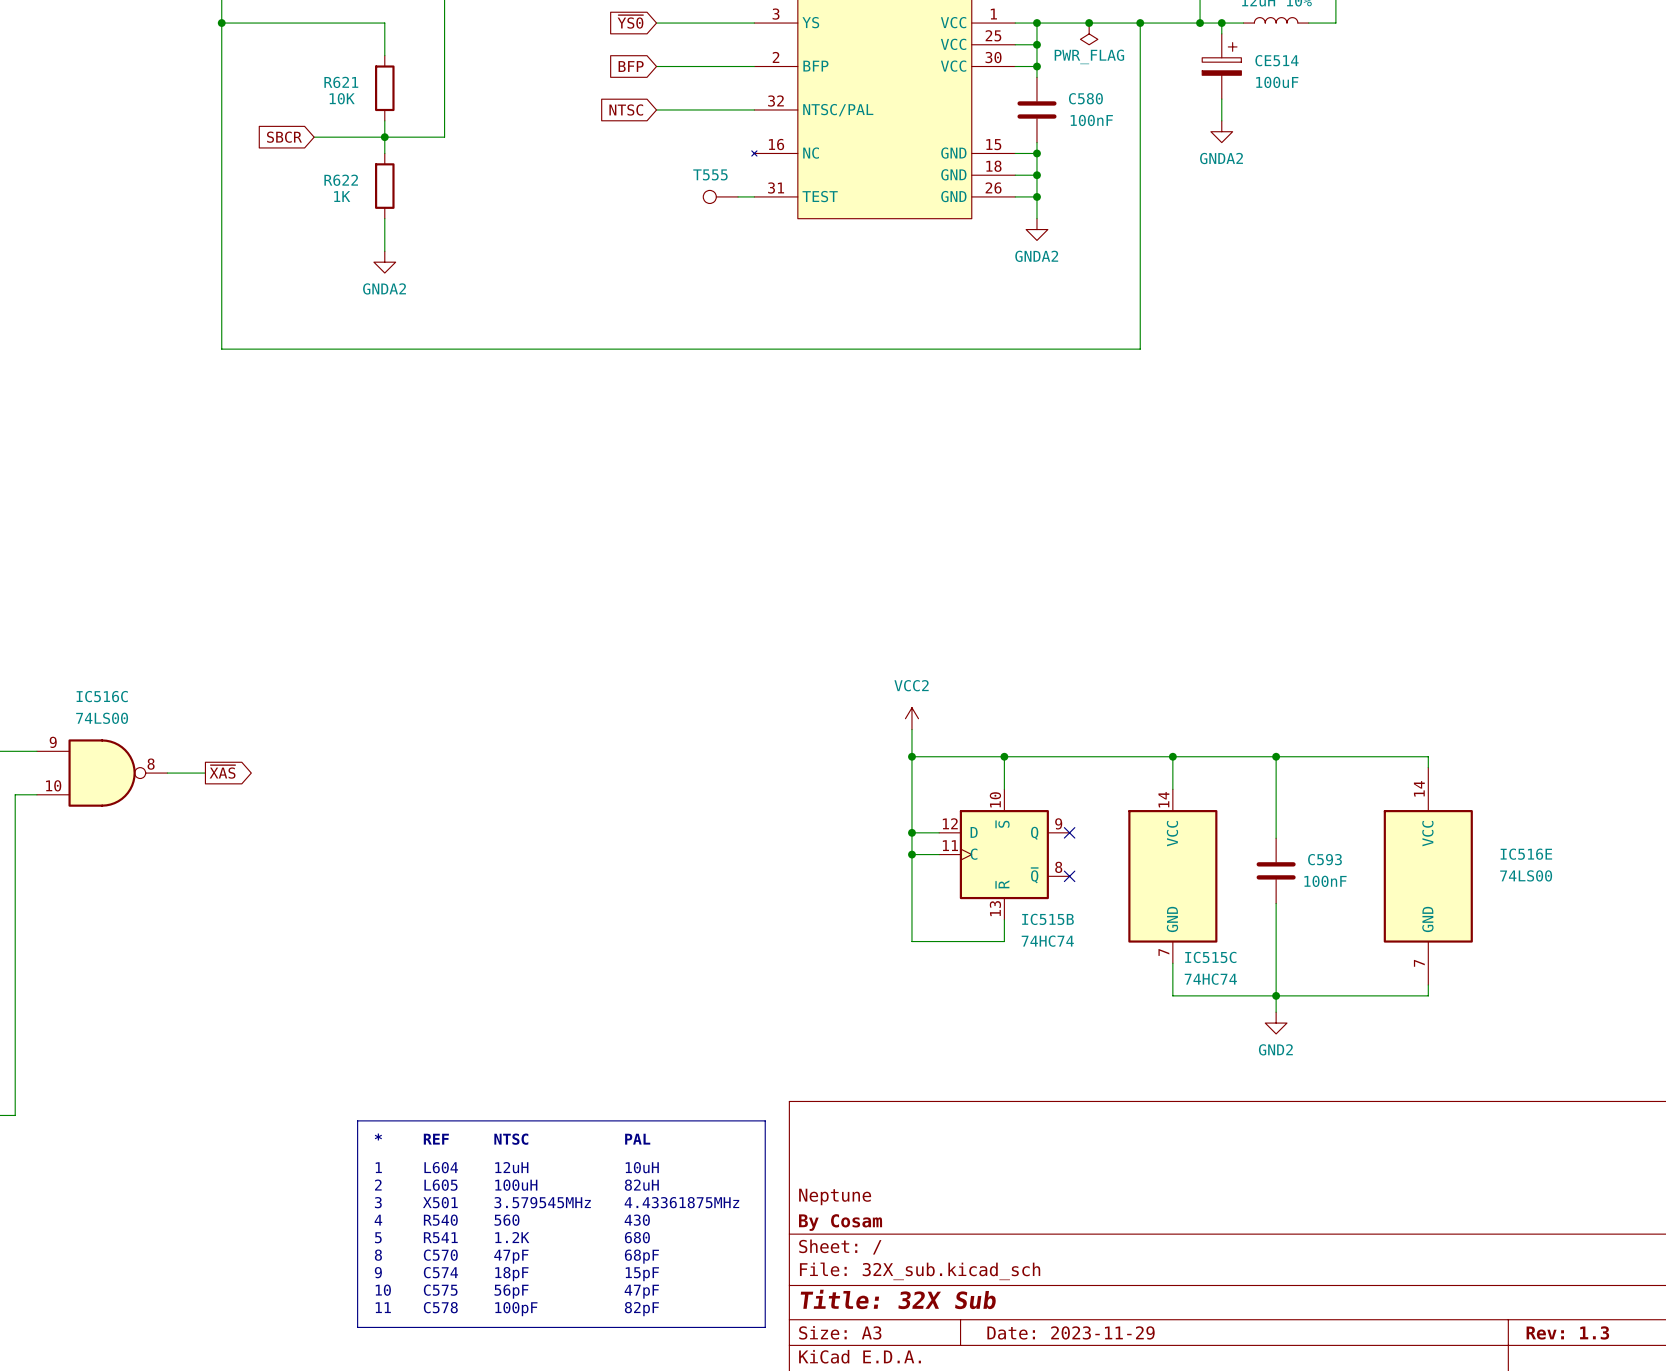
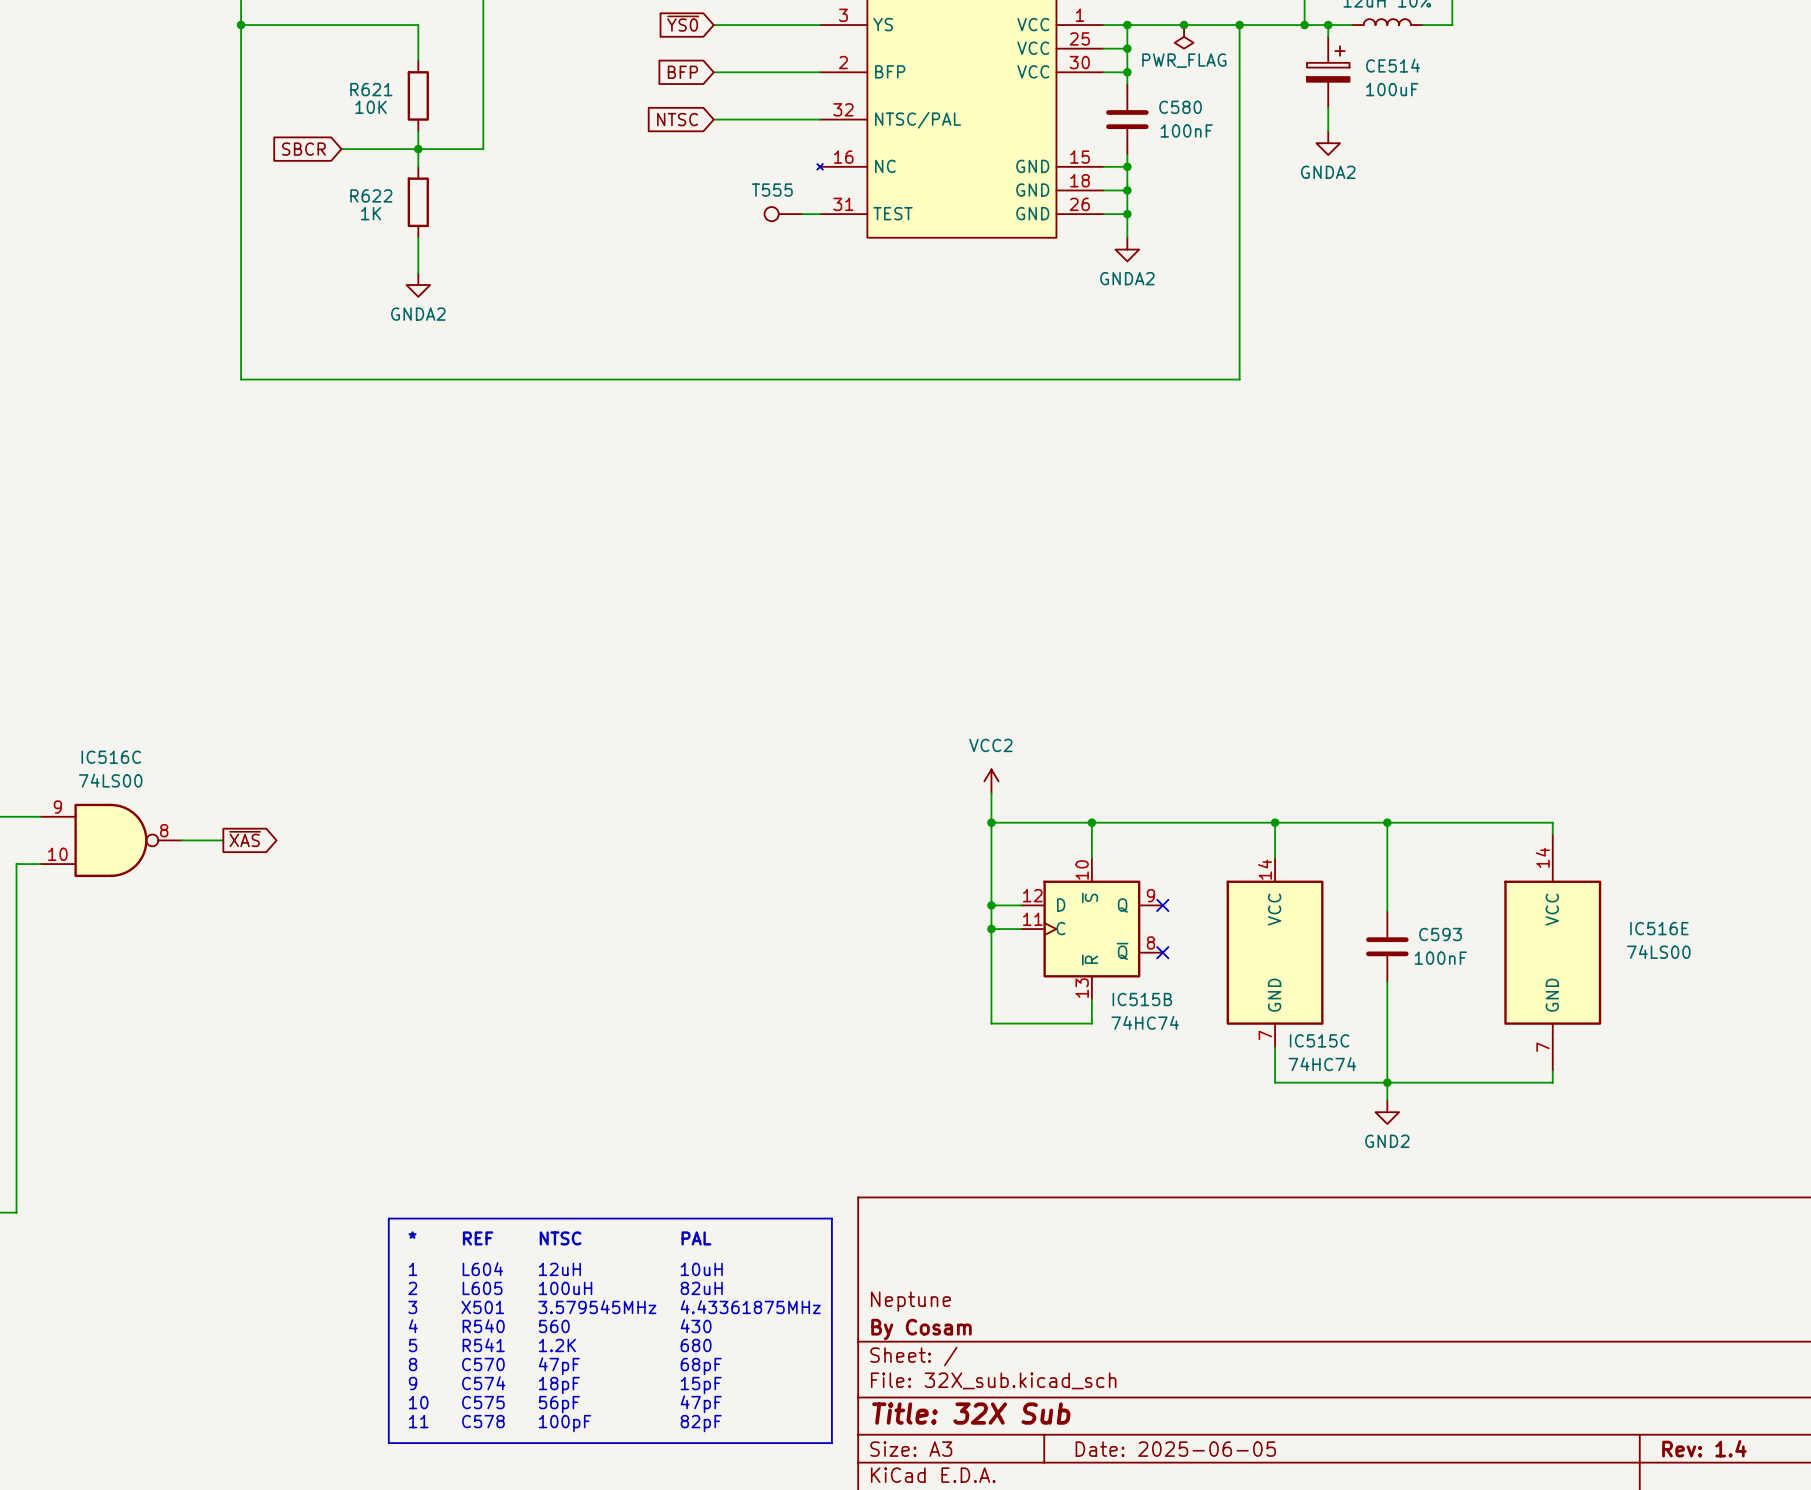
title block: Date: 2023-11-29 (1071, 1332) -> Date: 2025-06-05 (1175, 1449)
title block: Rev: 1.3 (1567, 1332) -> Rev: 1.4 (1704, 1448)

